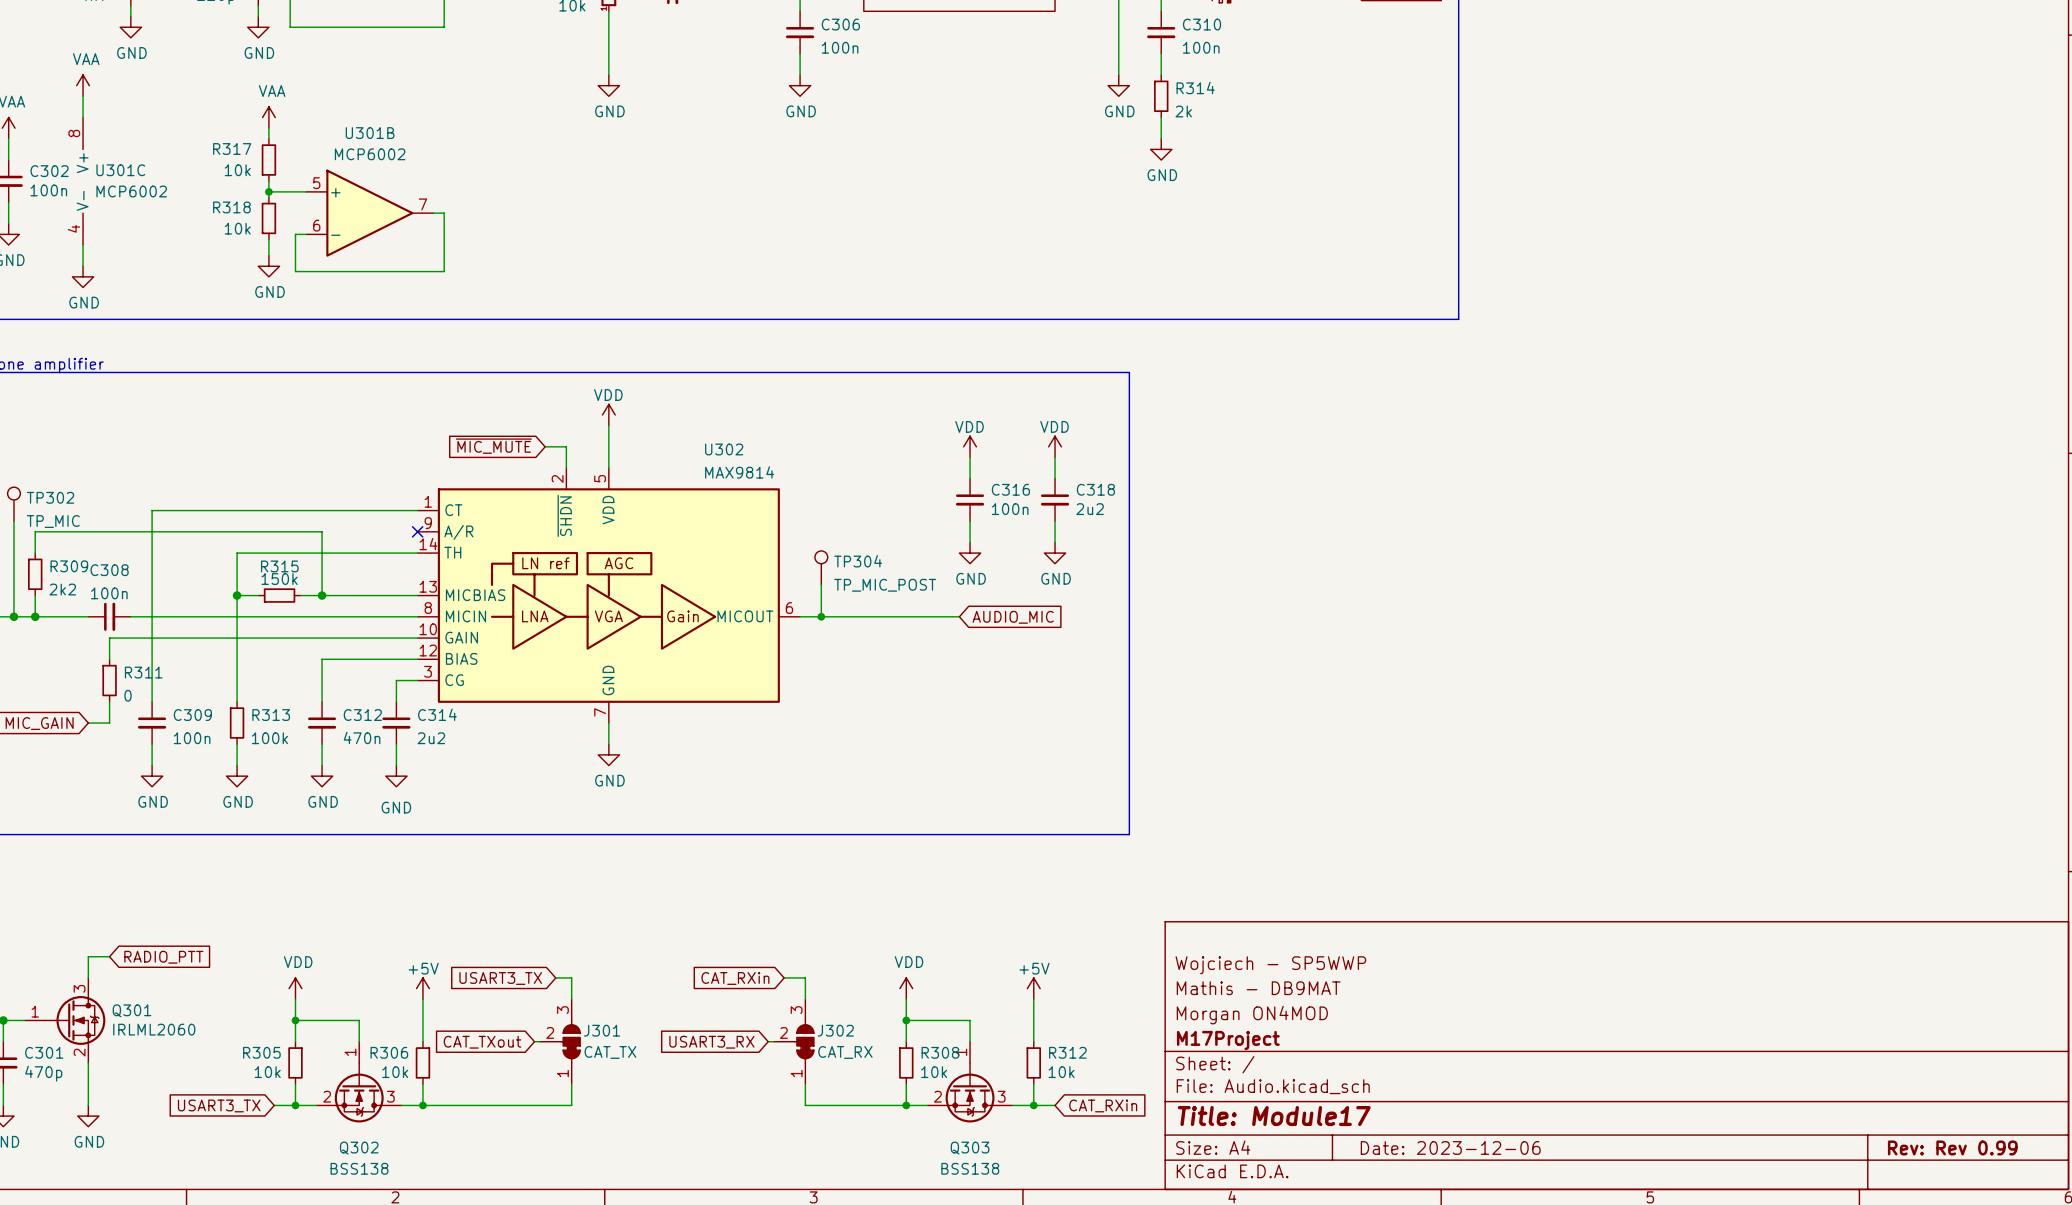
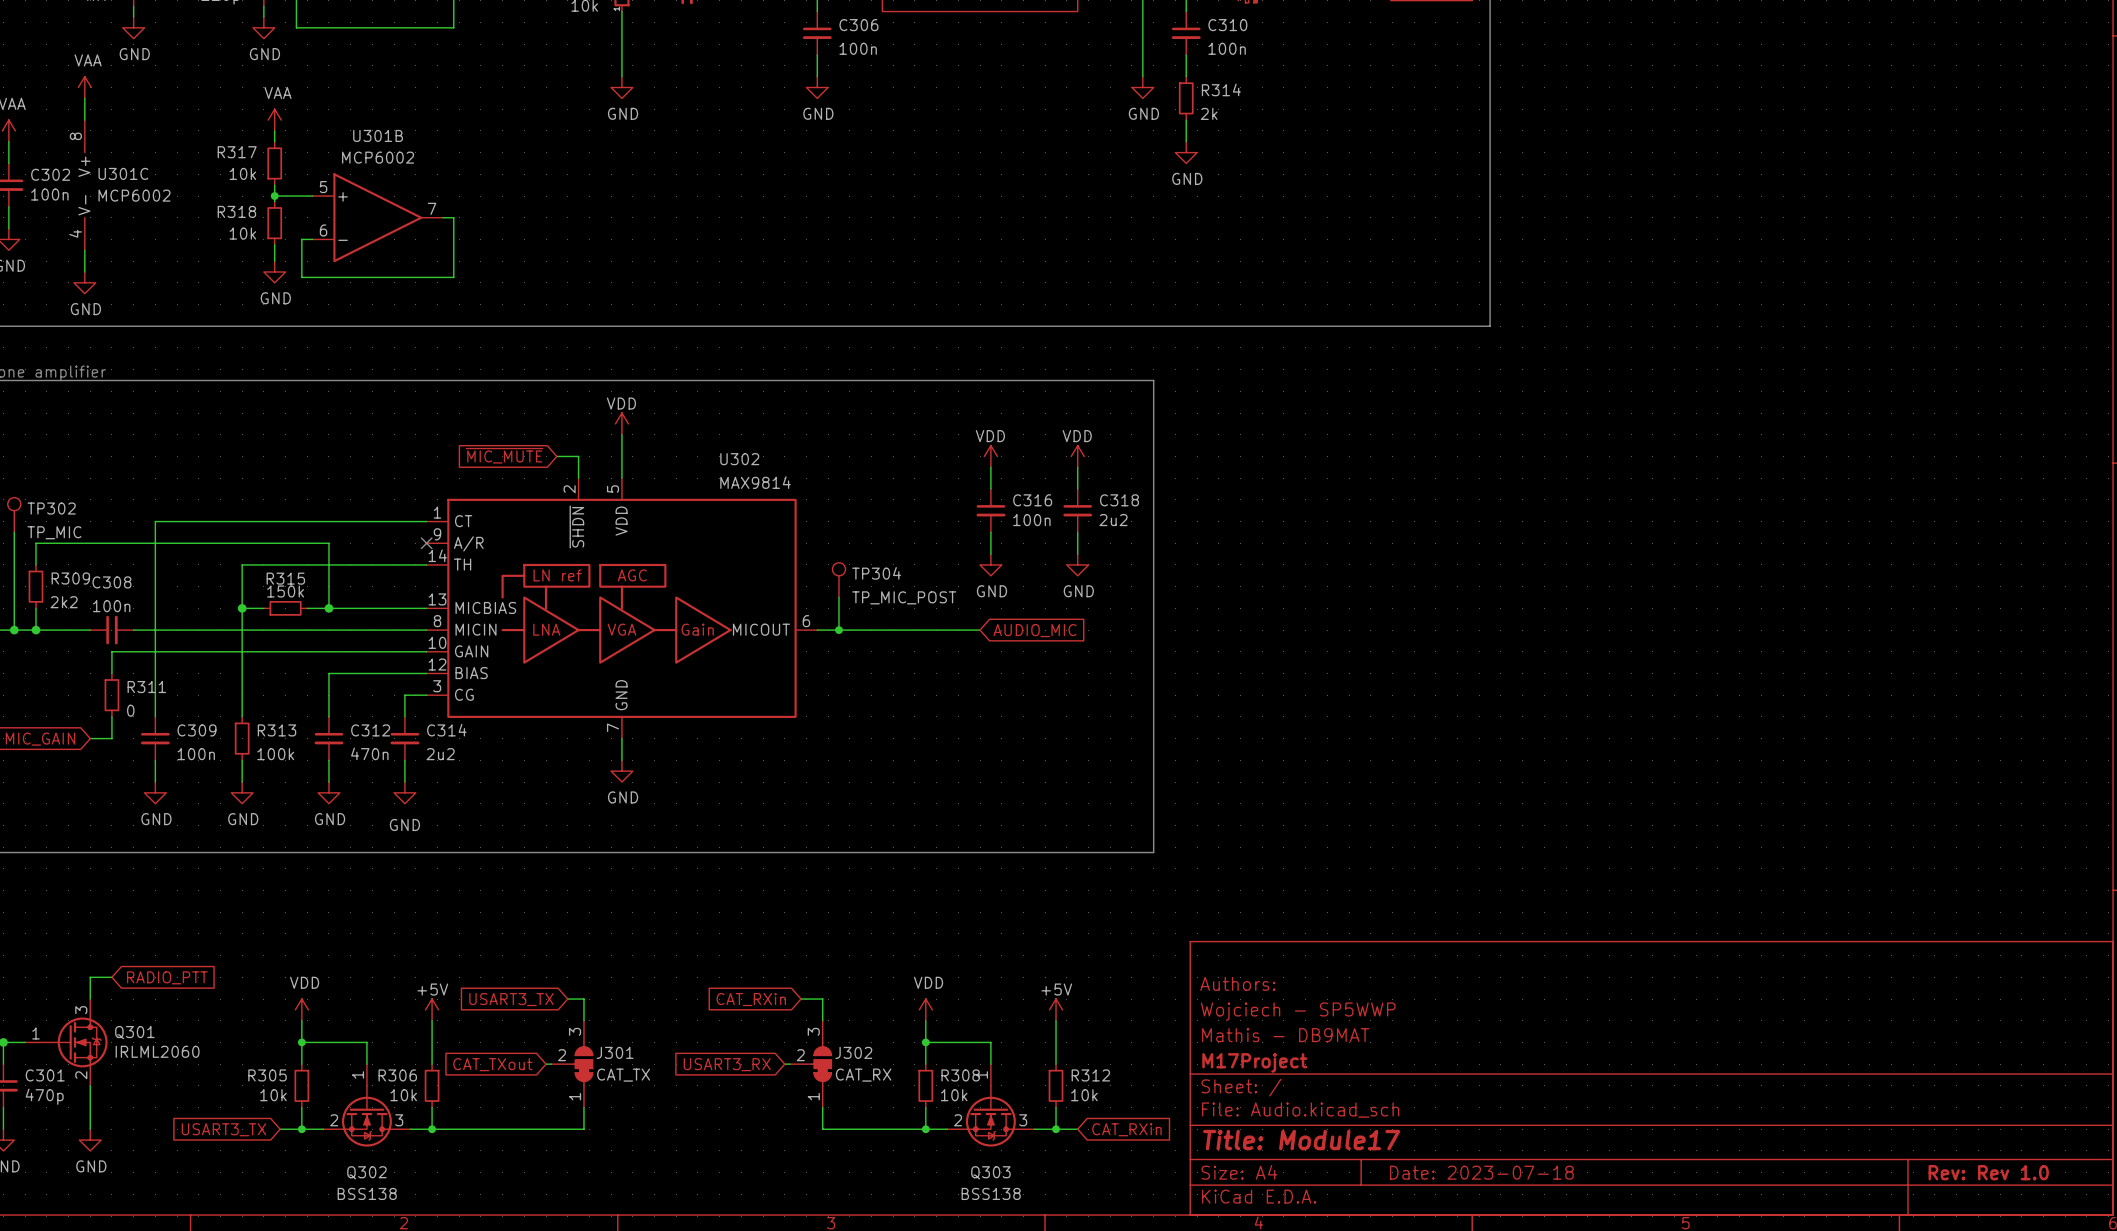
title block: Wojciech - SP5WWP (1270, 965) -> Authors: (1237, 983)
title block: Mathis - DB9MAT (1258, 988) -> Wojciech - SP5WWP (1298, 1011)
title block: Morgan ON4MOD (1252, 1015) -> Mathis - DB9MAT (1285, 1035)
title block: Date: 2023-12-06 (1450, 1147) -> Date: 2023-07-18 (1481, 1172)
title block: Rev: Rev 0.99 (1952, 1147) -> Rev: Rev 1.0 (1988, 1172)

